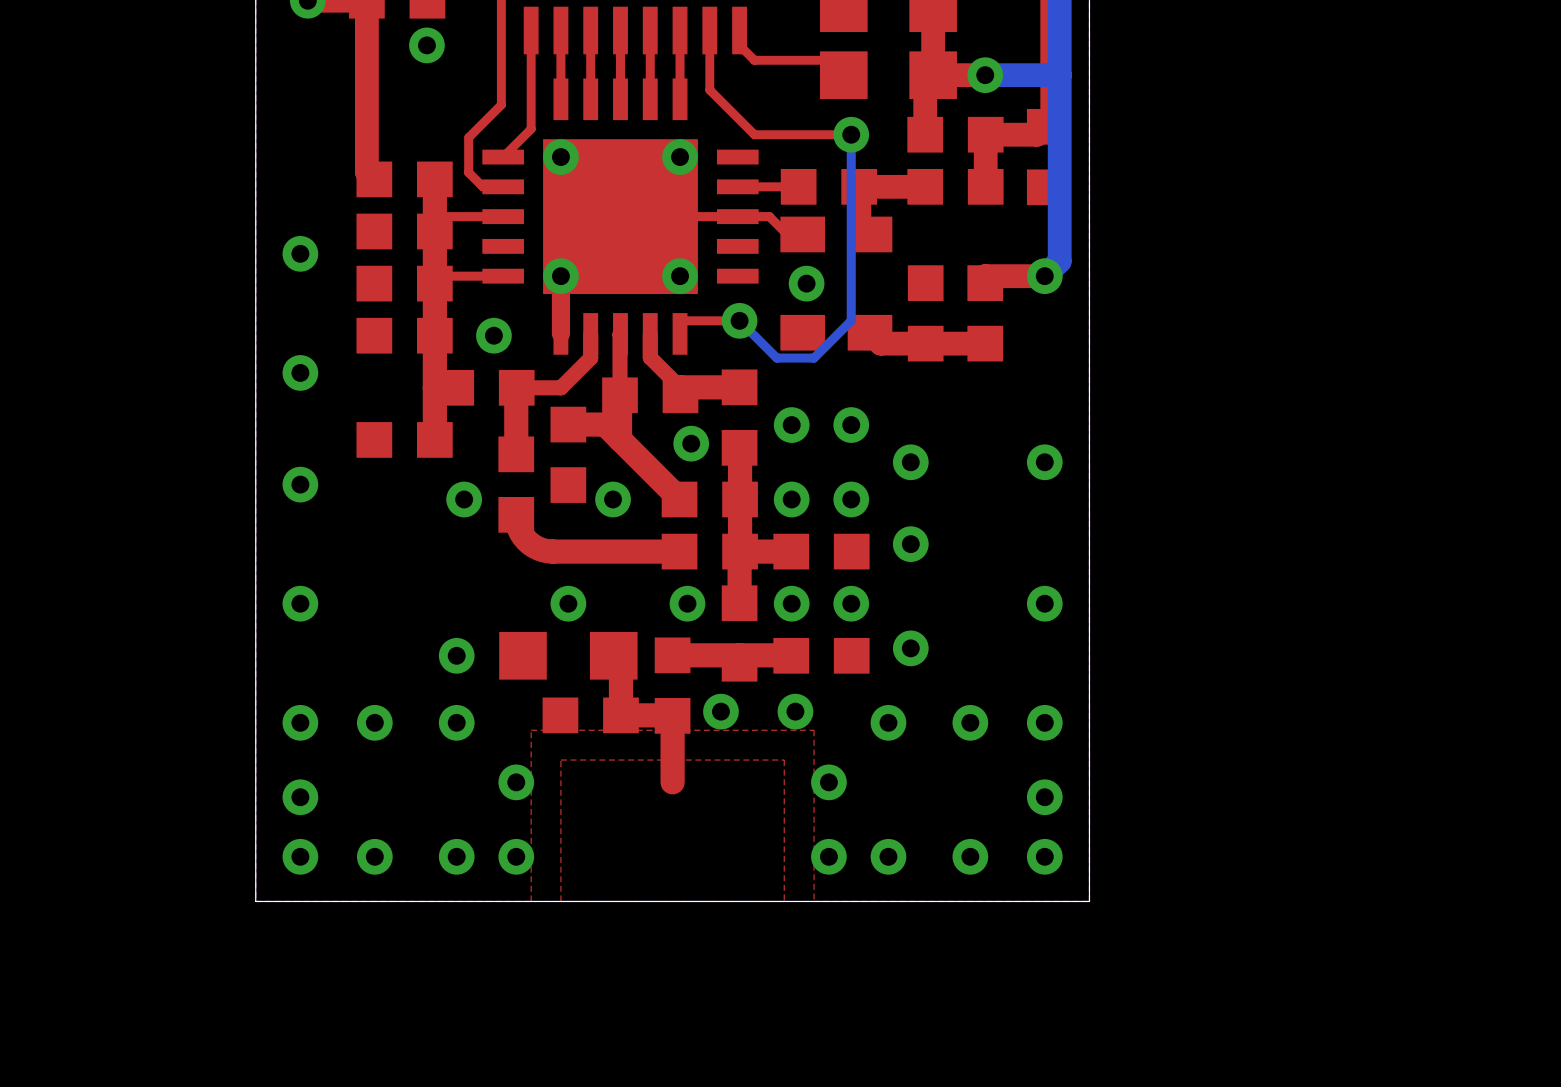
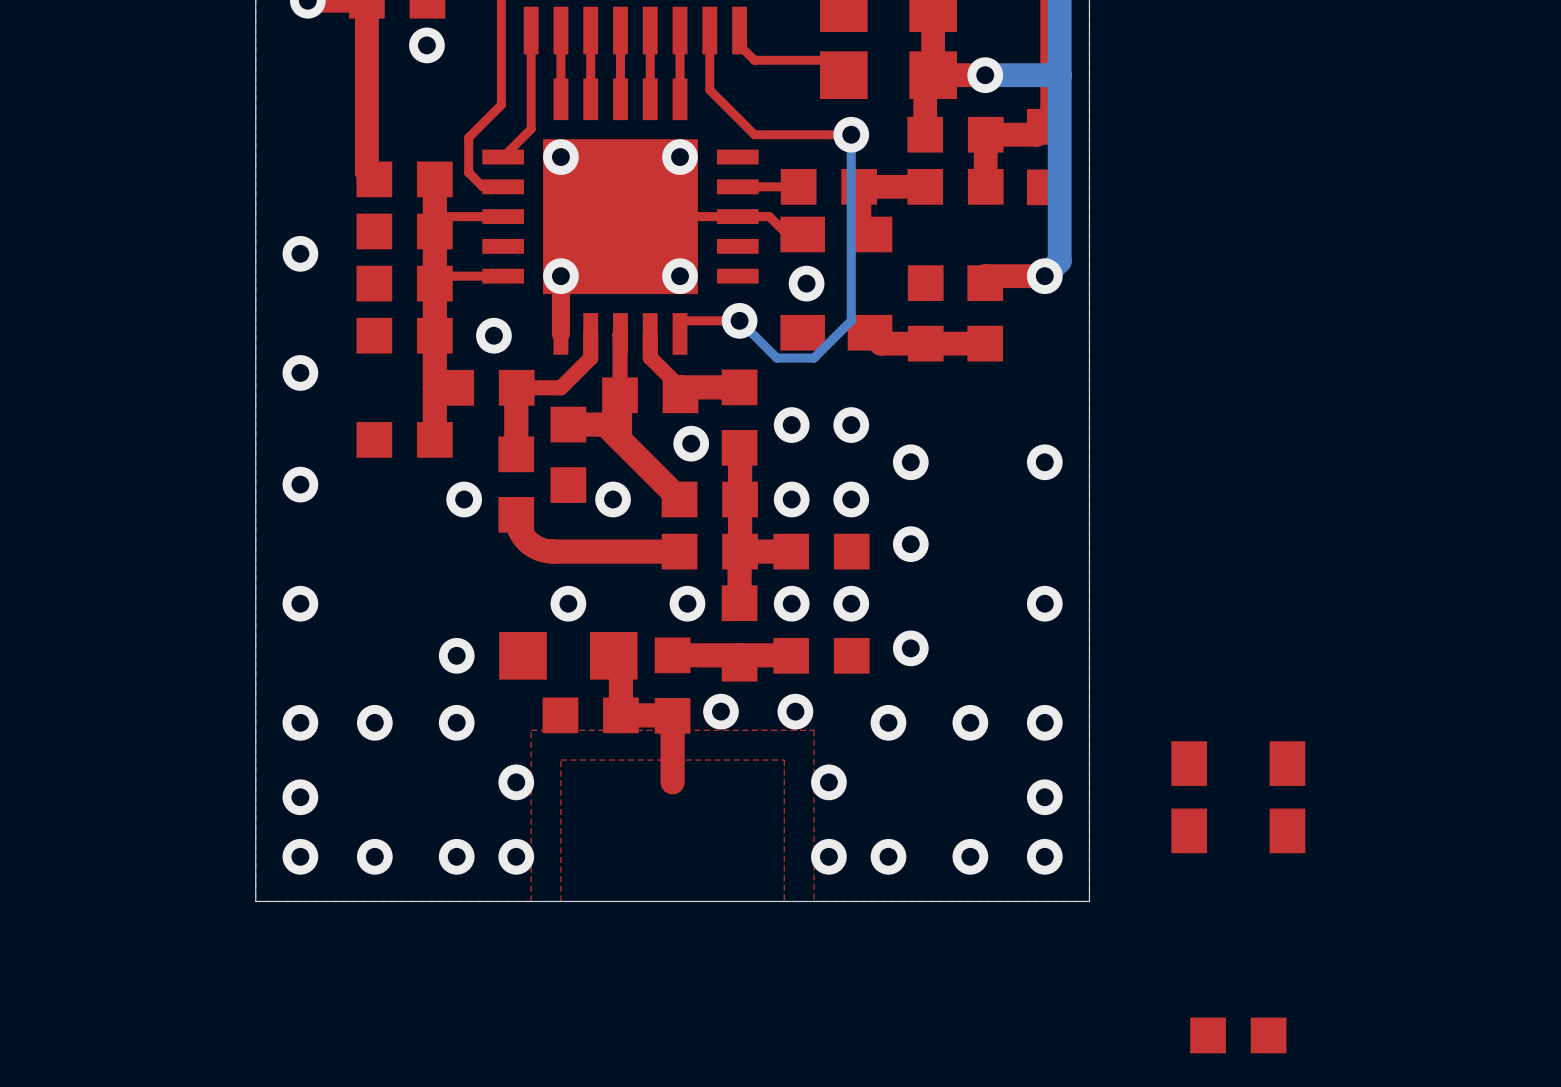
part: none -> (1238, 797)
part: none -> (1238, 1035)

